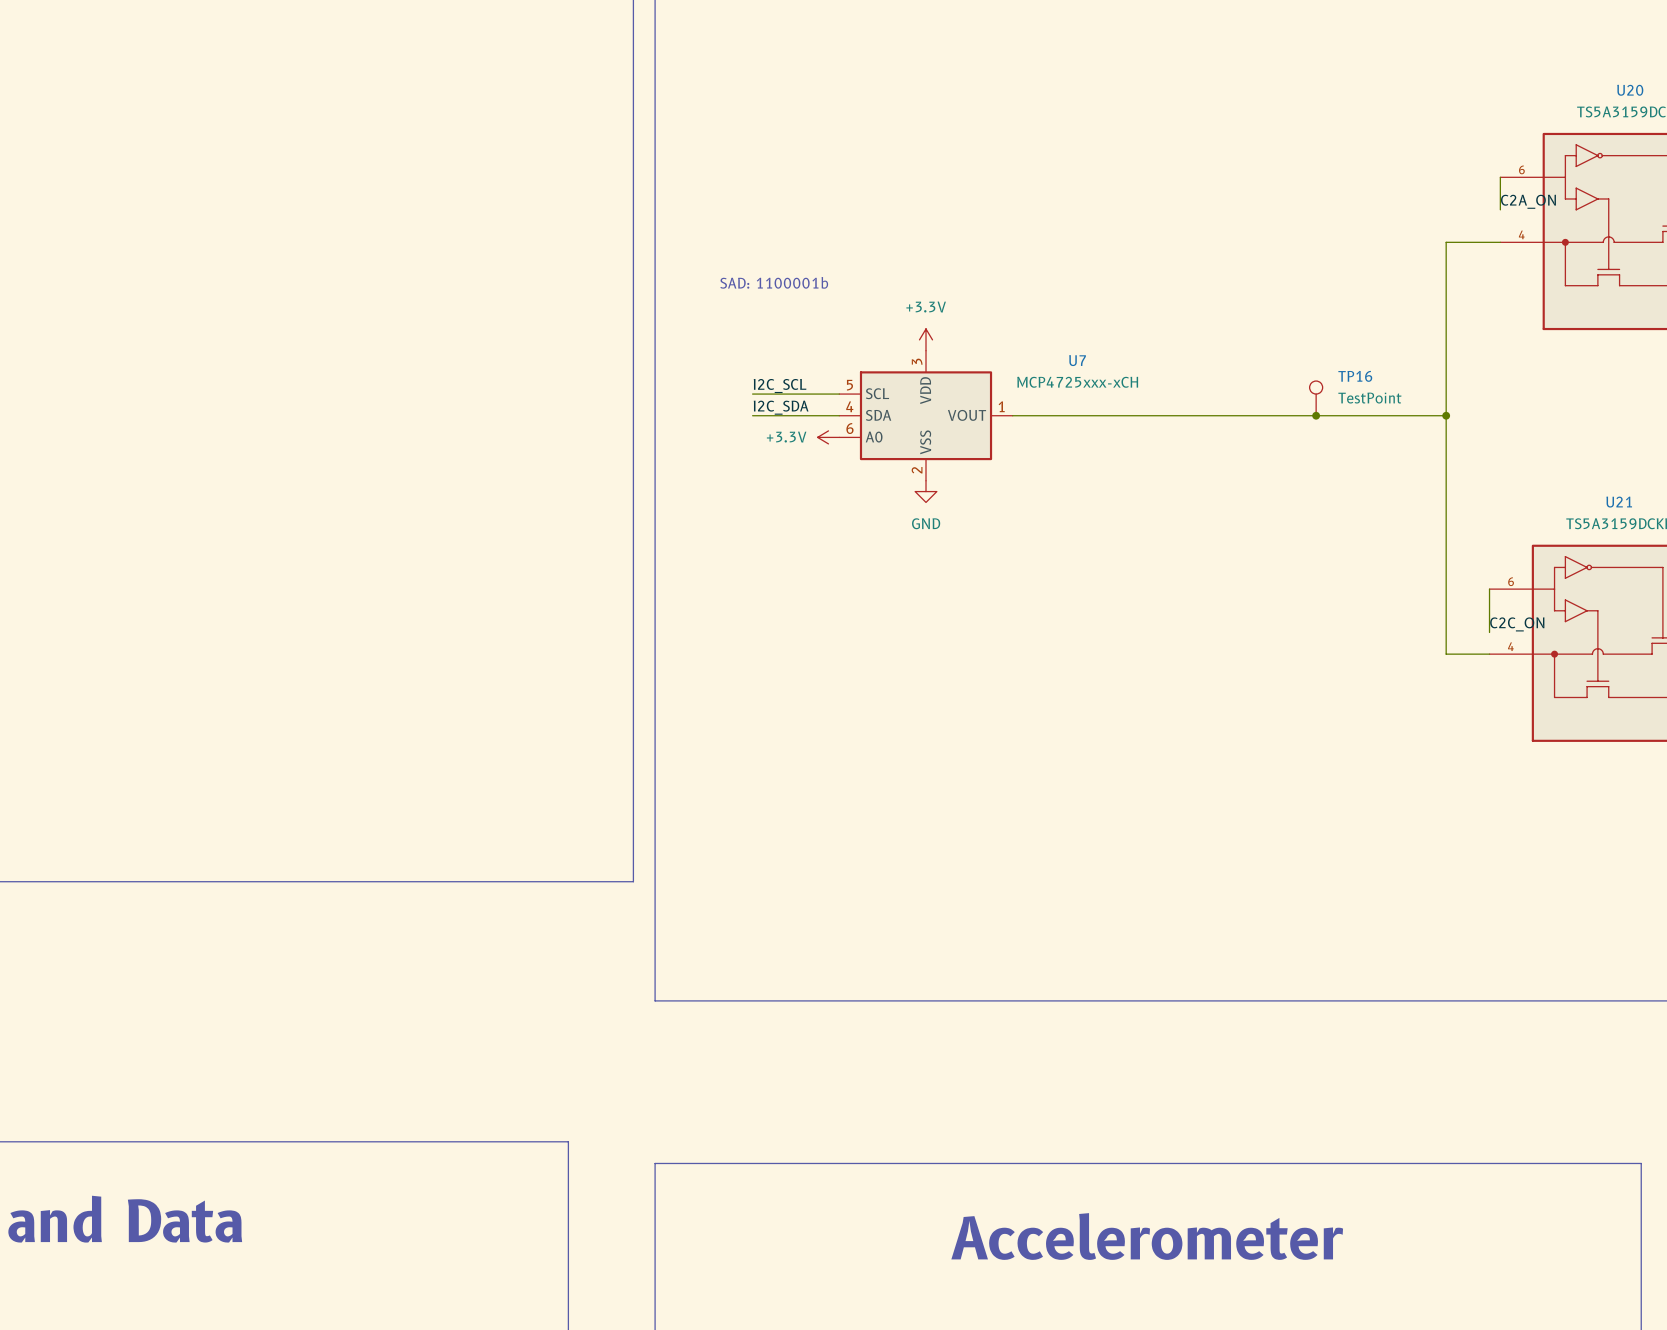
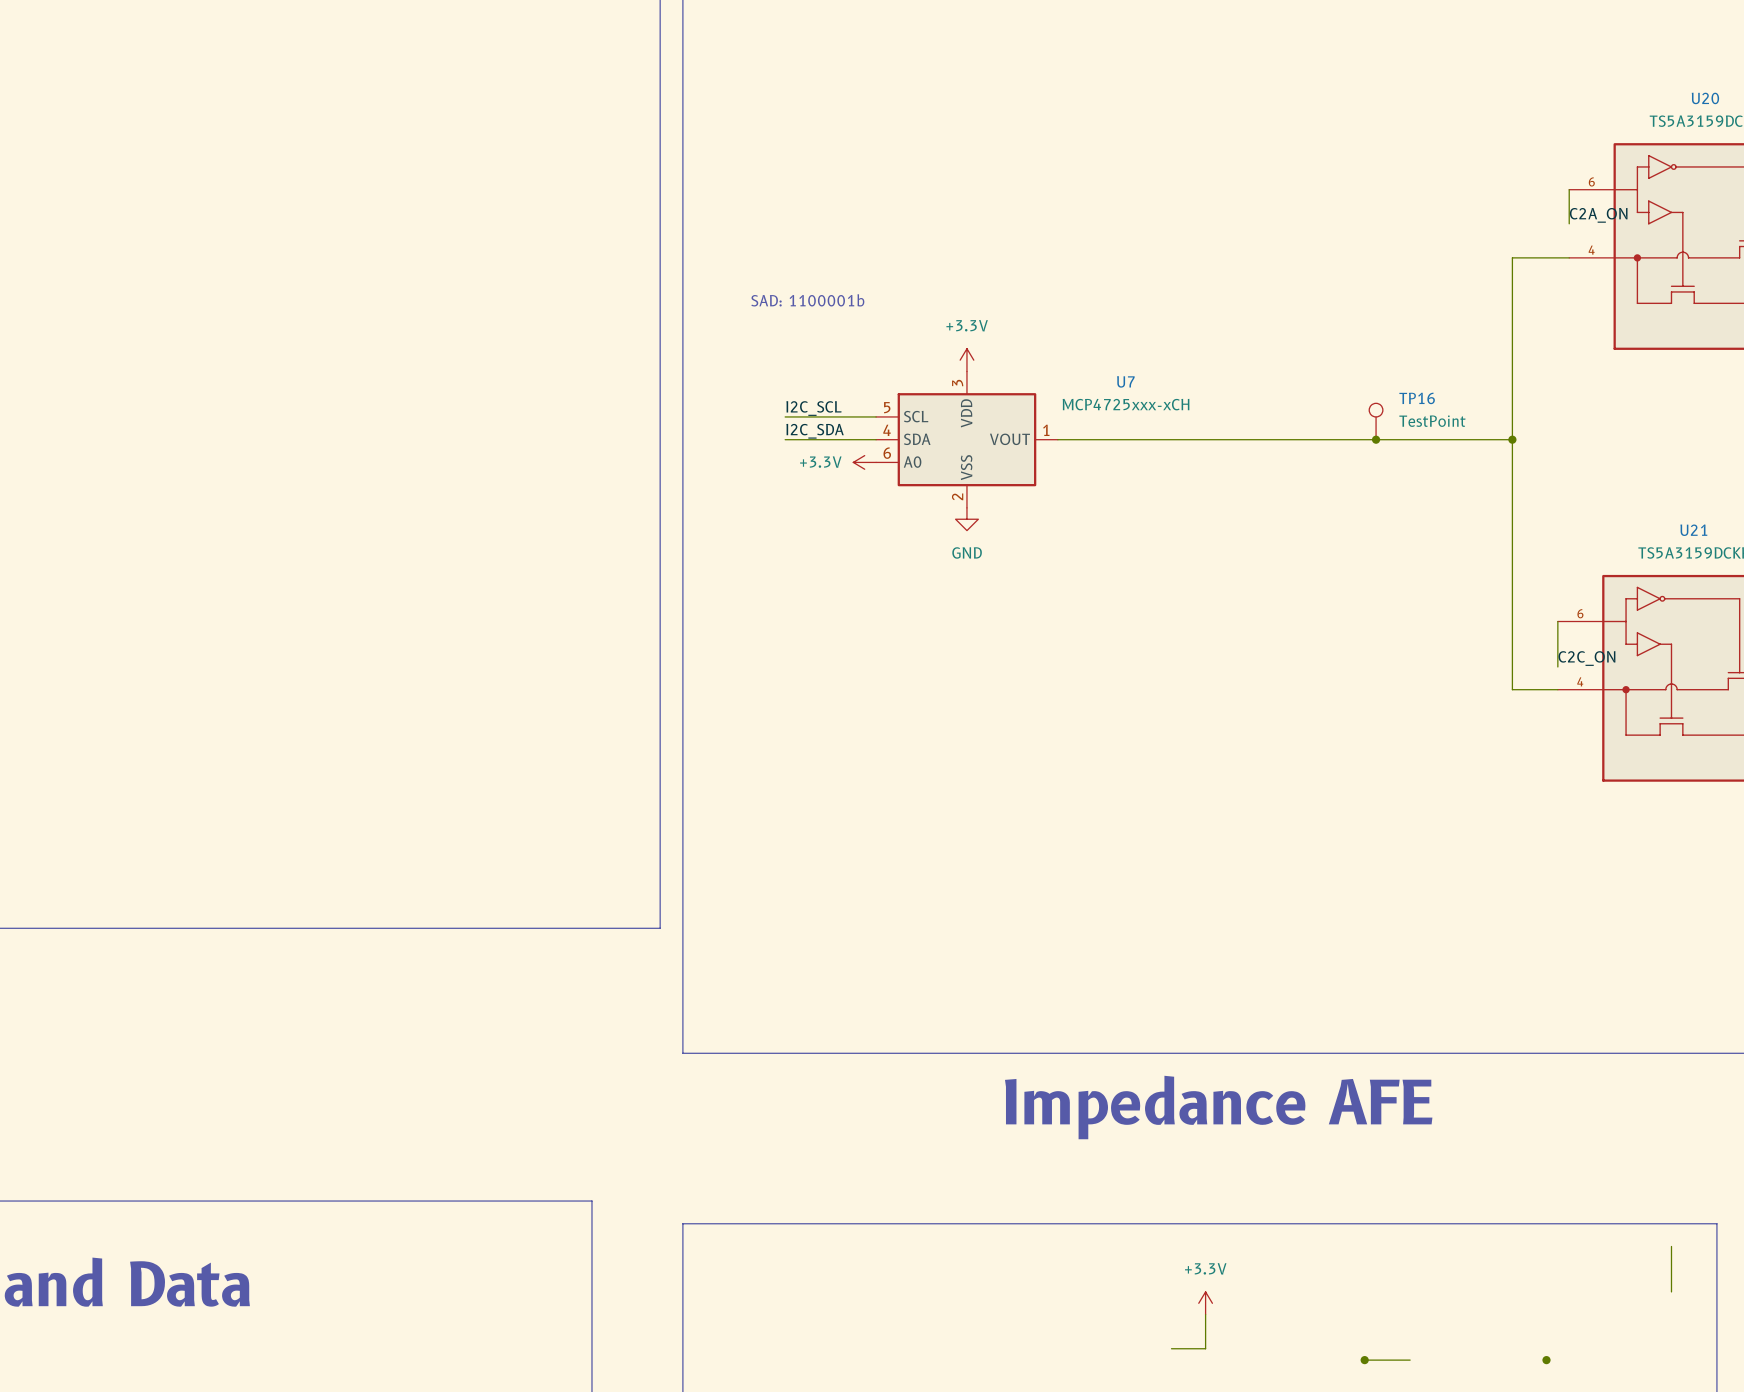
text: none -> Impedance AFE (1218, 1107)
wire: none -> (1671, 1246) (1671, 1291)
text: Accelerometer (1147, 1236) -> none
power symbol: none -> +3.3V (1205, 1303)
wire: none -> (1205, 1314) (1205, 1348) (1171, 1348)
wire: none -> (1364, 1360) (1410, 1360)
junction: none -> (1364, 1360)
junction: none -> (1546, 1360)

